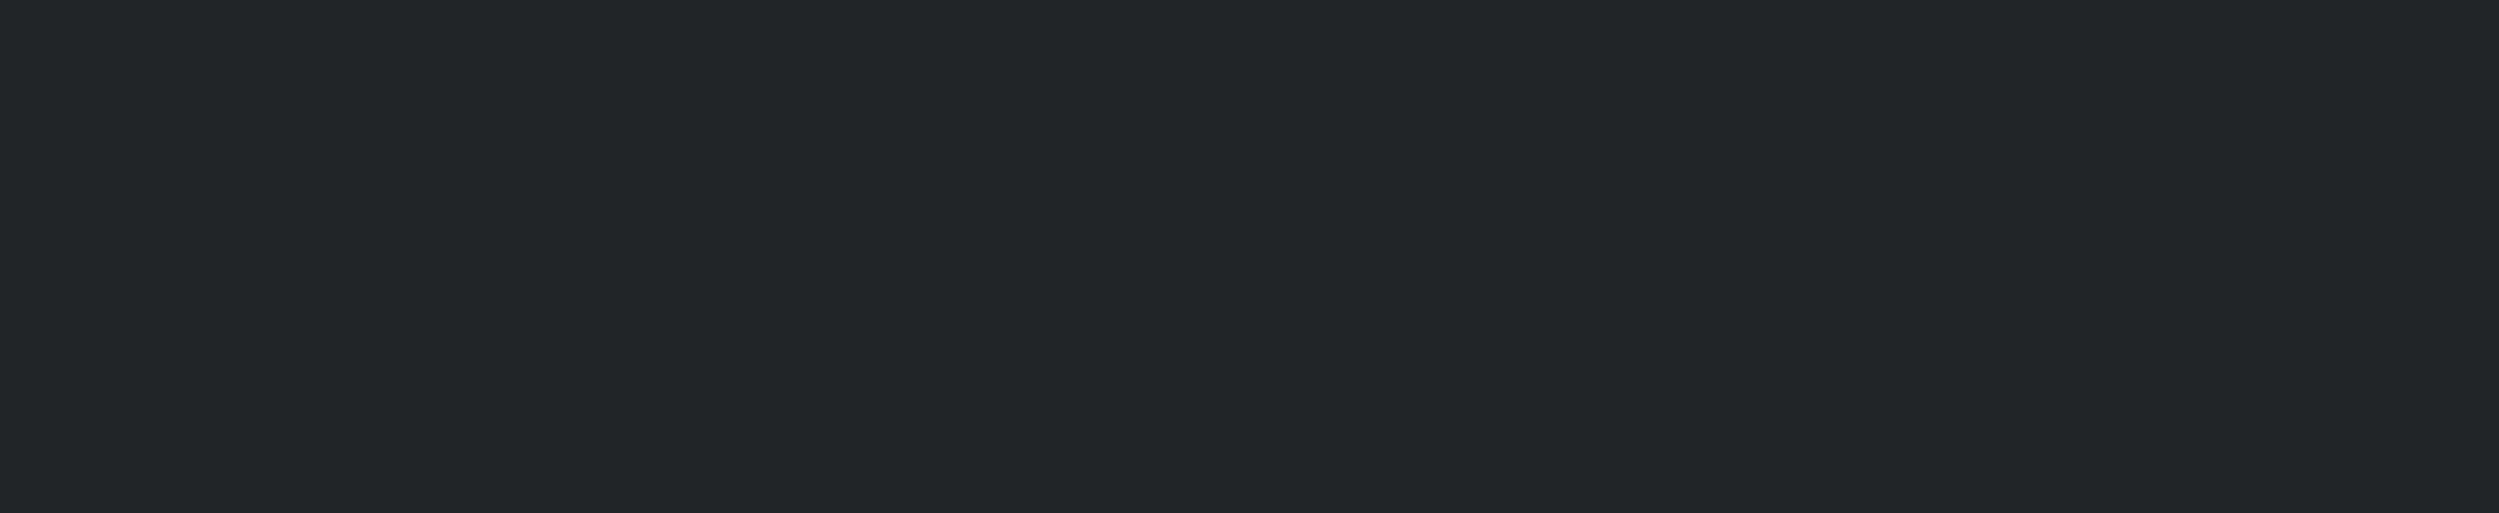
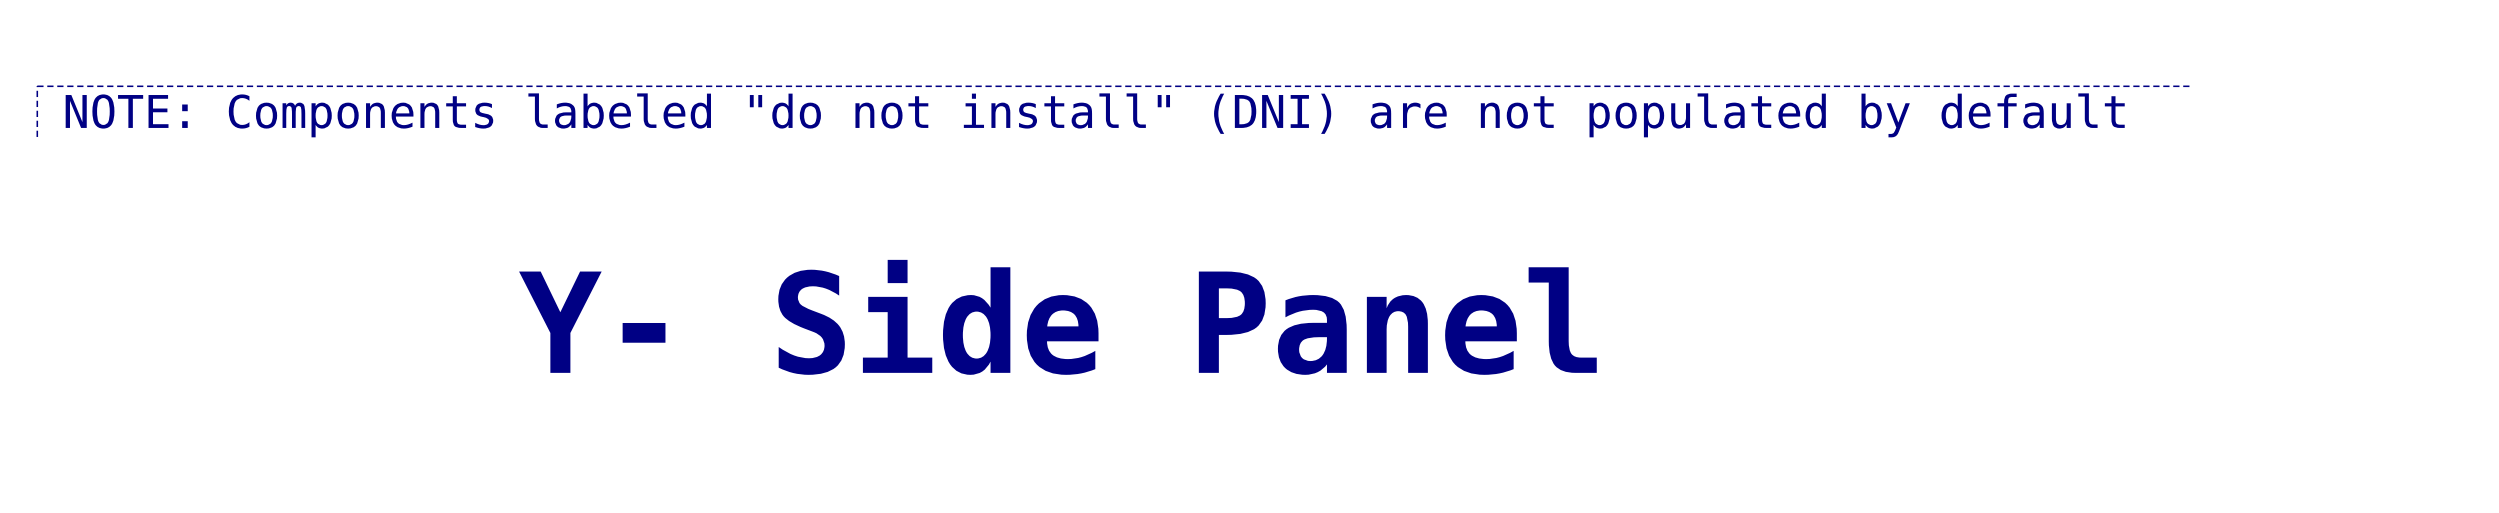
line: none -> (2190, 86) (37, 86) (37, 136)
text: none -> NOTE: Components labeled "do not install" (DNI) are not populated by default (1095, 115)
text: none -> Y- Side Panel (1057, 317)

